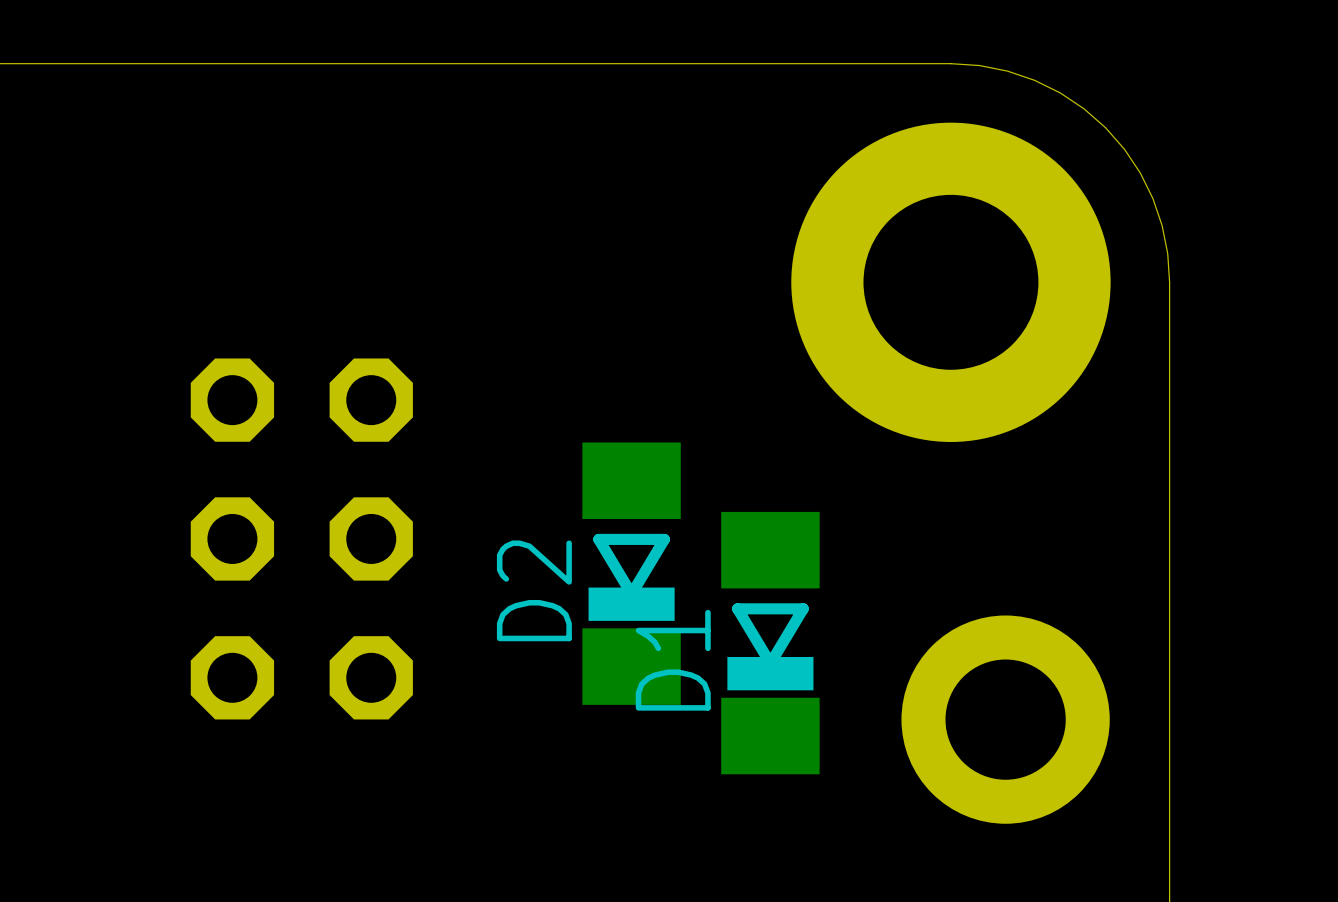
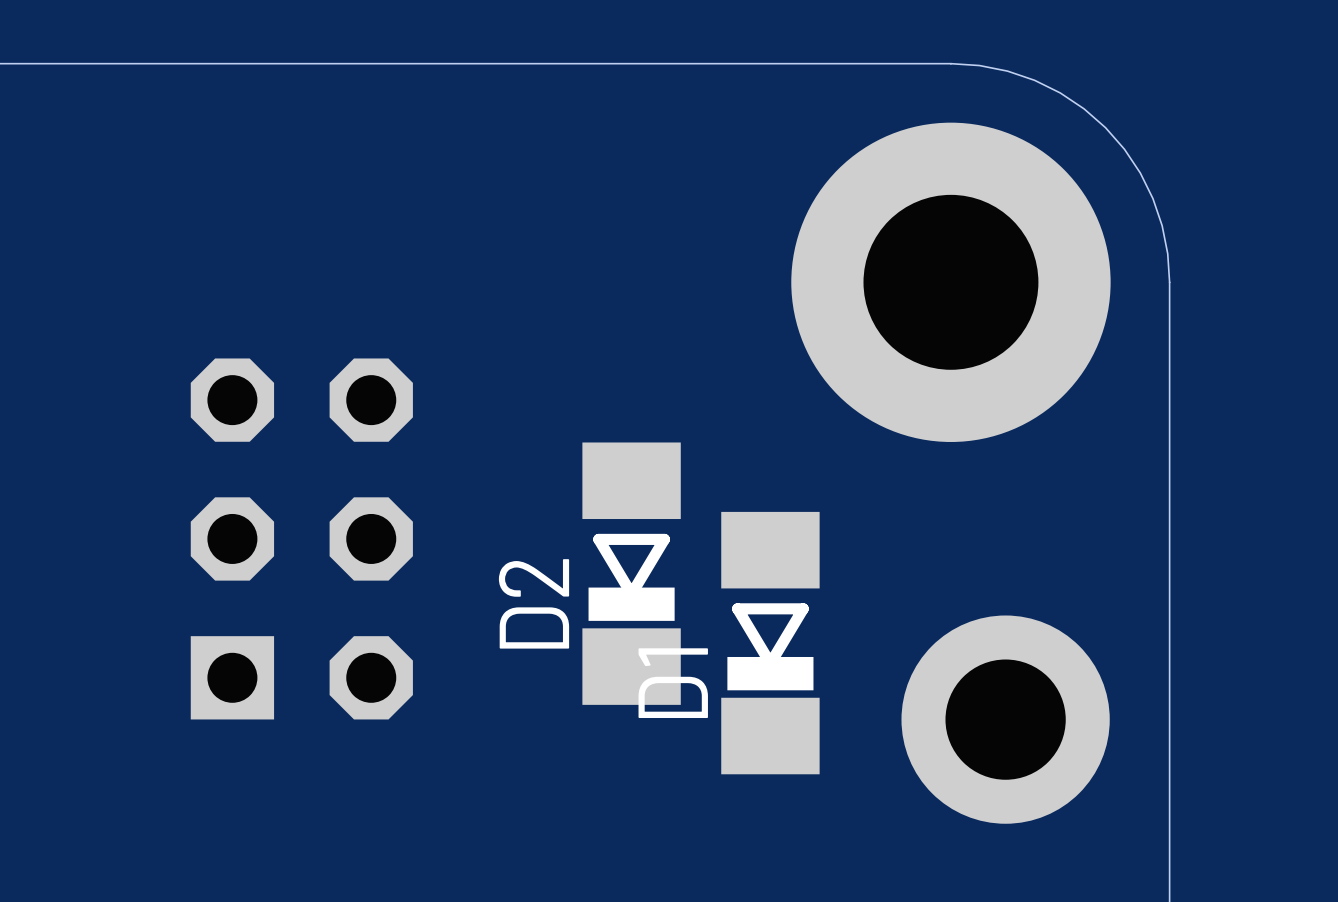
part footprint: [190, 358, 413, 720] -> [190, 358, 413, 720]

